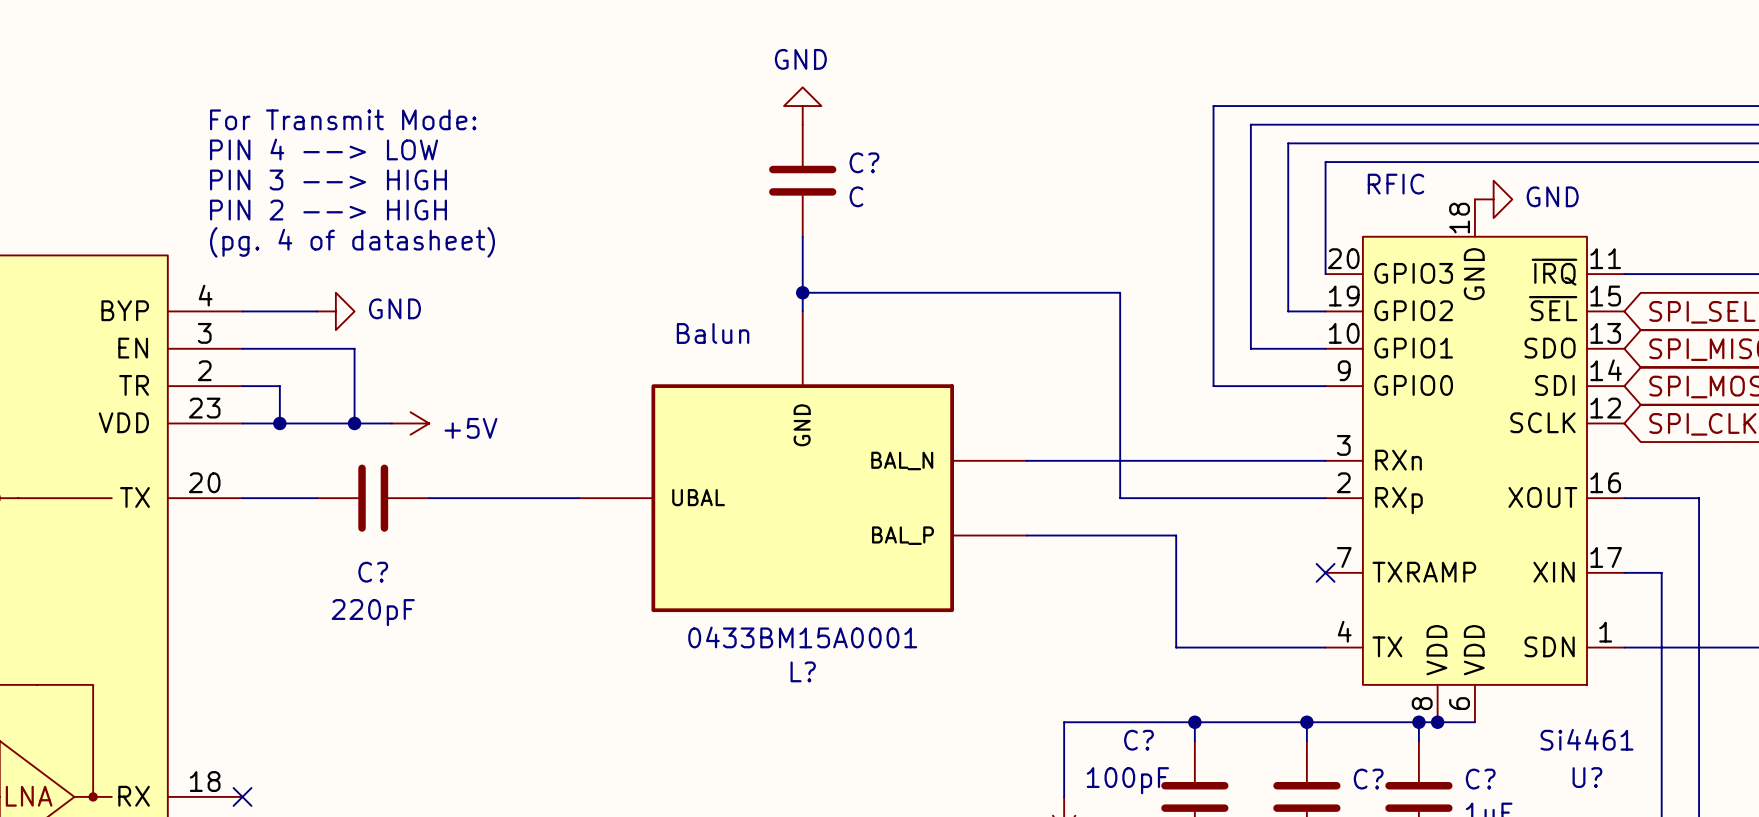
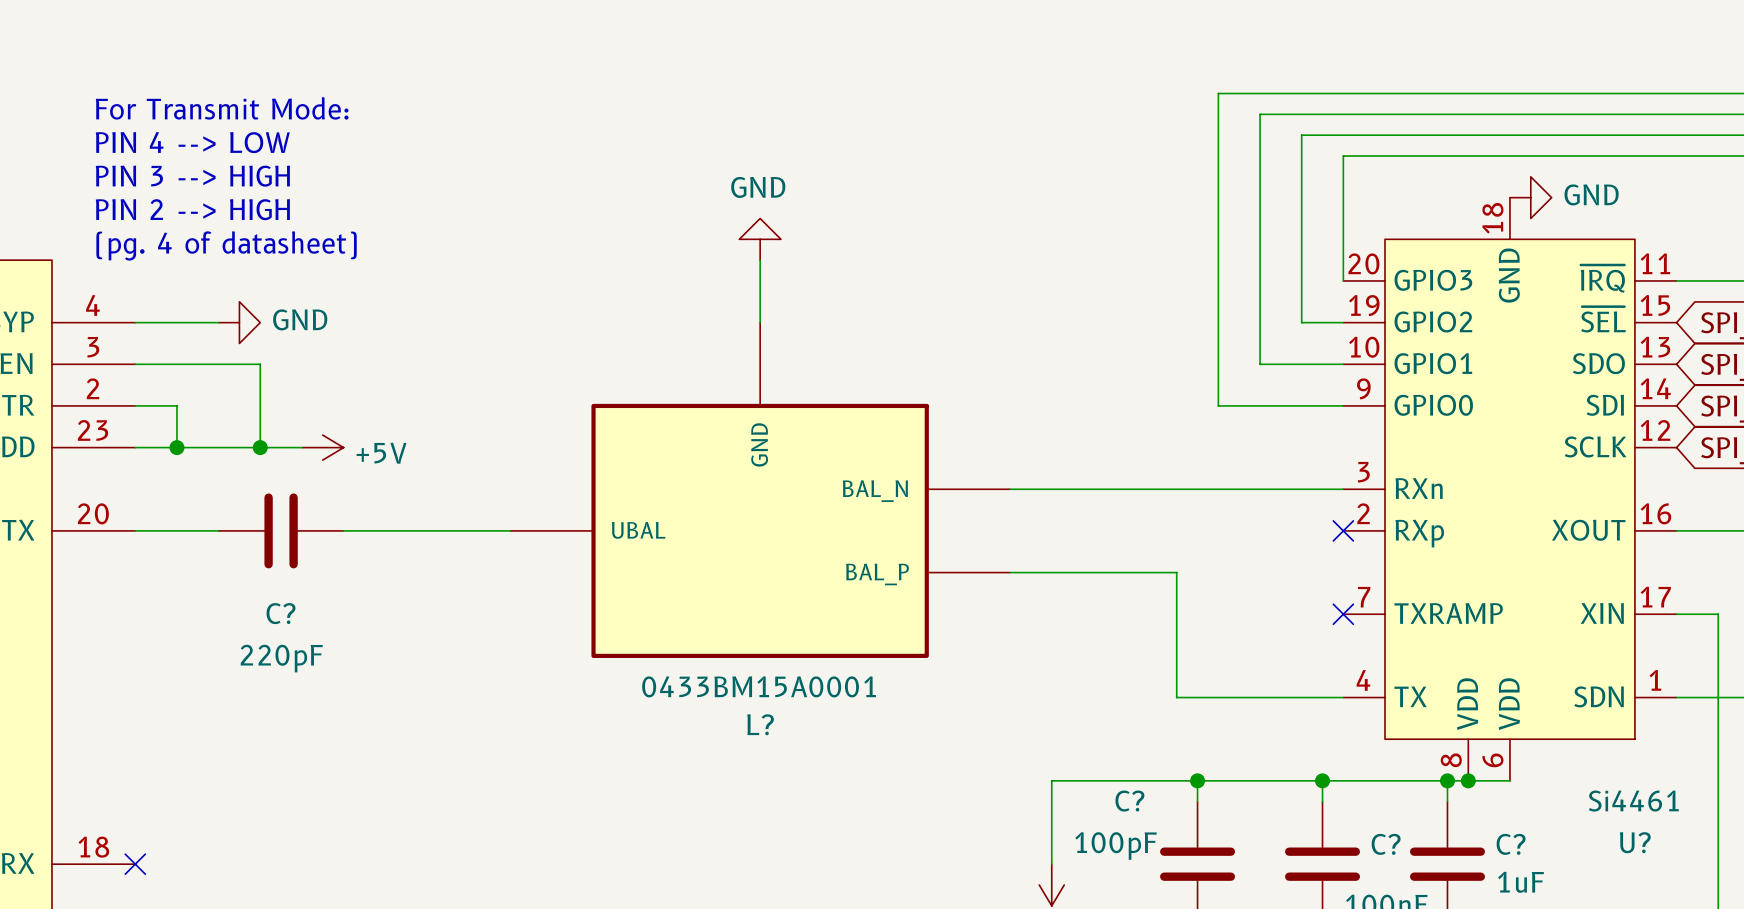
power symbol position: GND (802, 106) -> GND (760, 239)
C?: C (802, 180) -> none
text: RFIC (1395, 184) -> none
wire: (802, 292) (1120, 292) (1120, 498) (1325, 498) -> none
junction: (802, 292) -> none
text: Balun (713, 333) -> none
no-connect mark: none -> (1343, 530)

